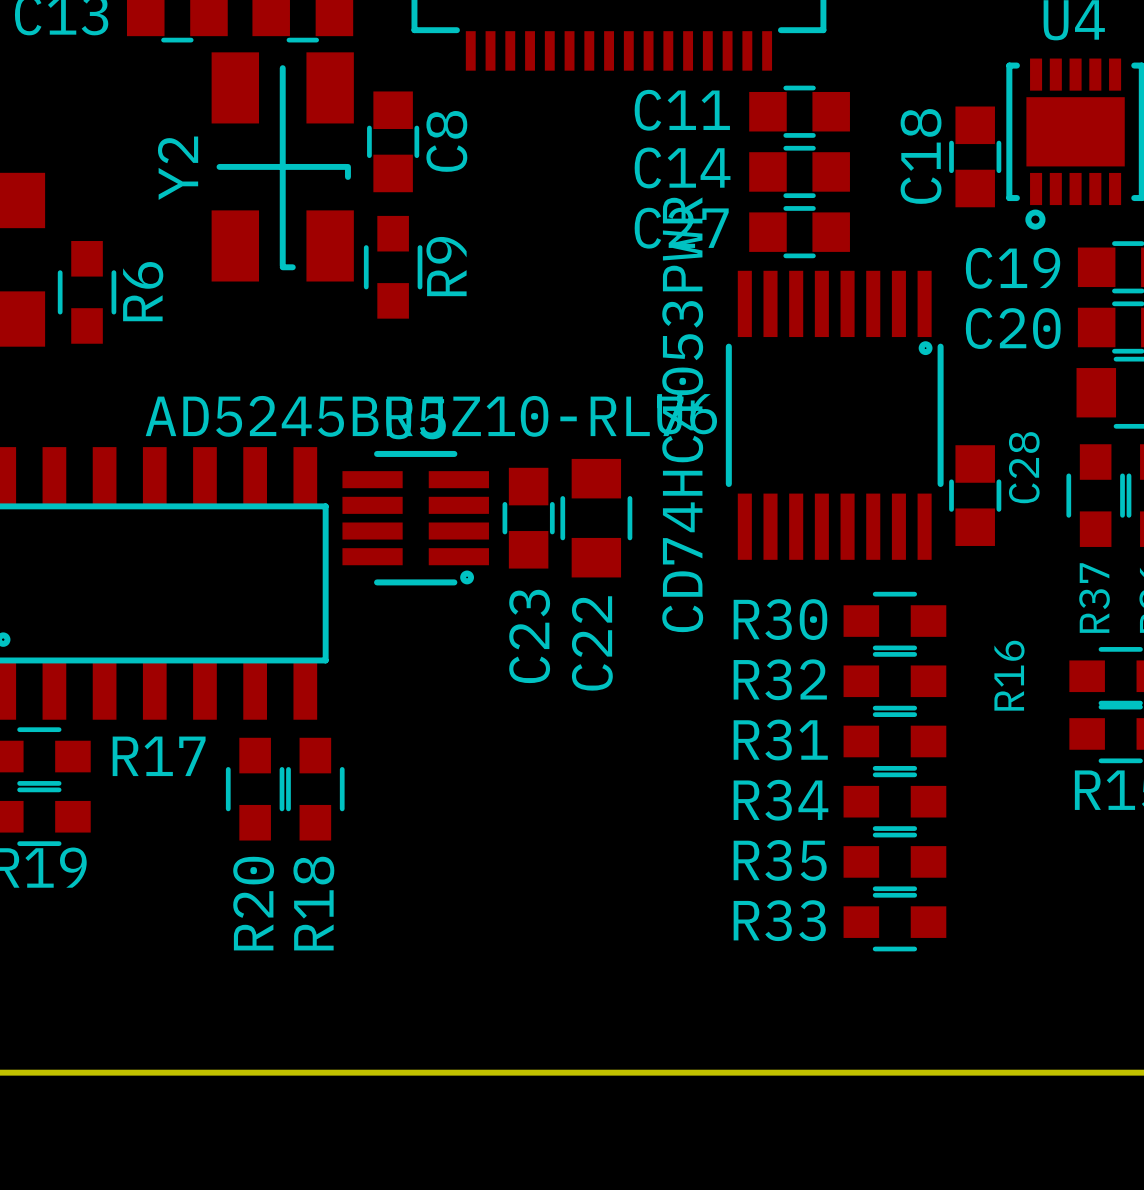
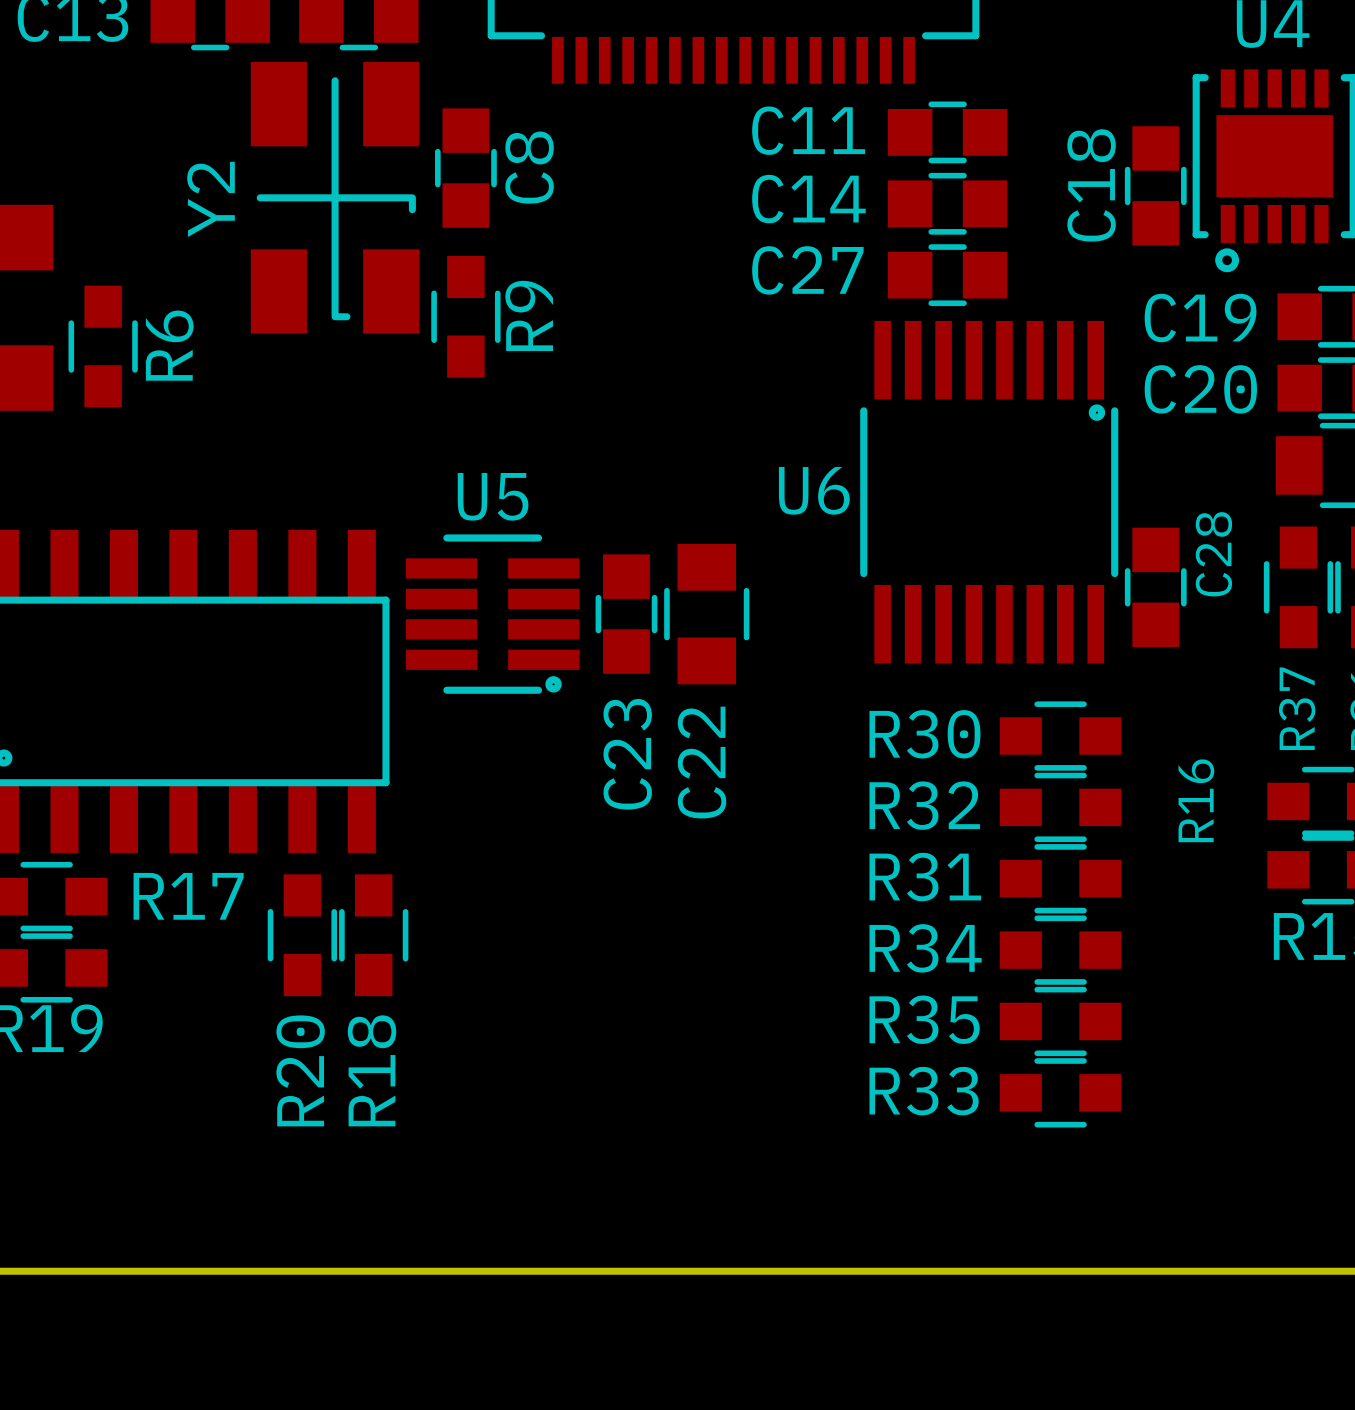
U6 value: CD74HC4053PWR (682, 414) -> none
U5 value: AD5245BRJZ10-RL7 (414, 416) -> none

